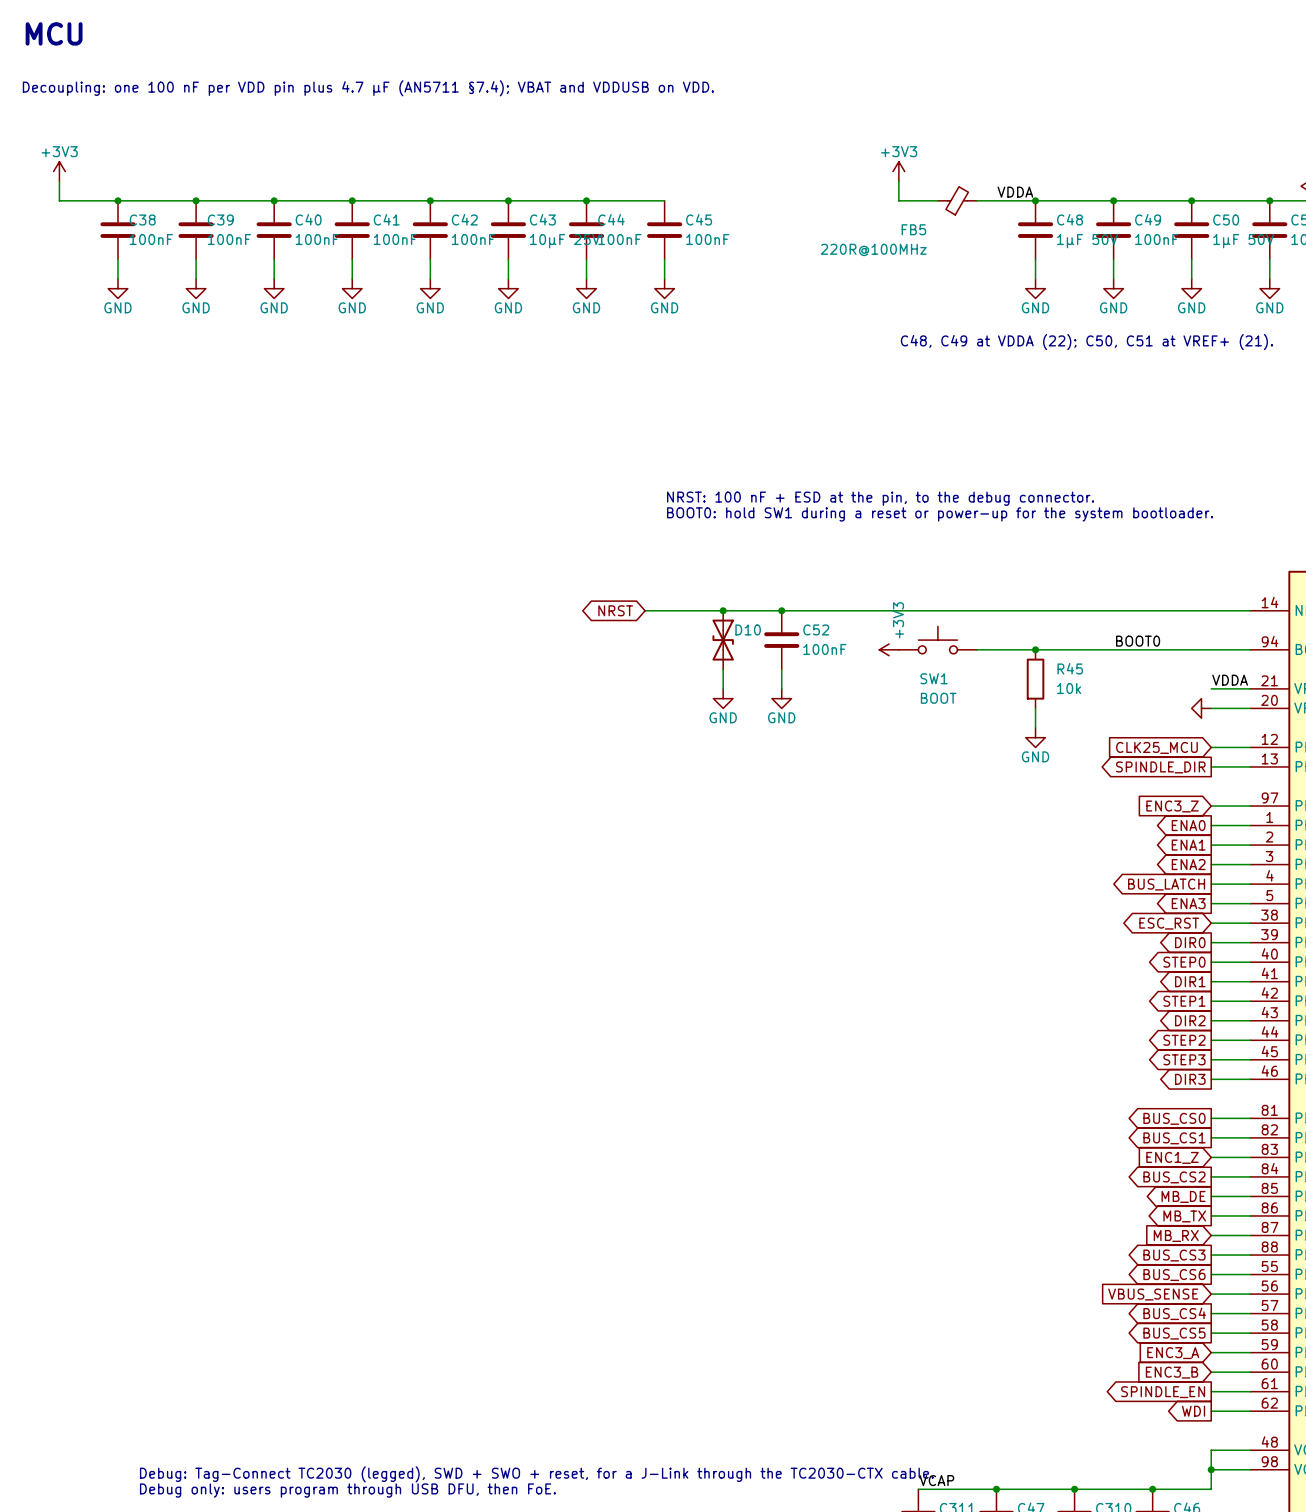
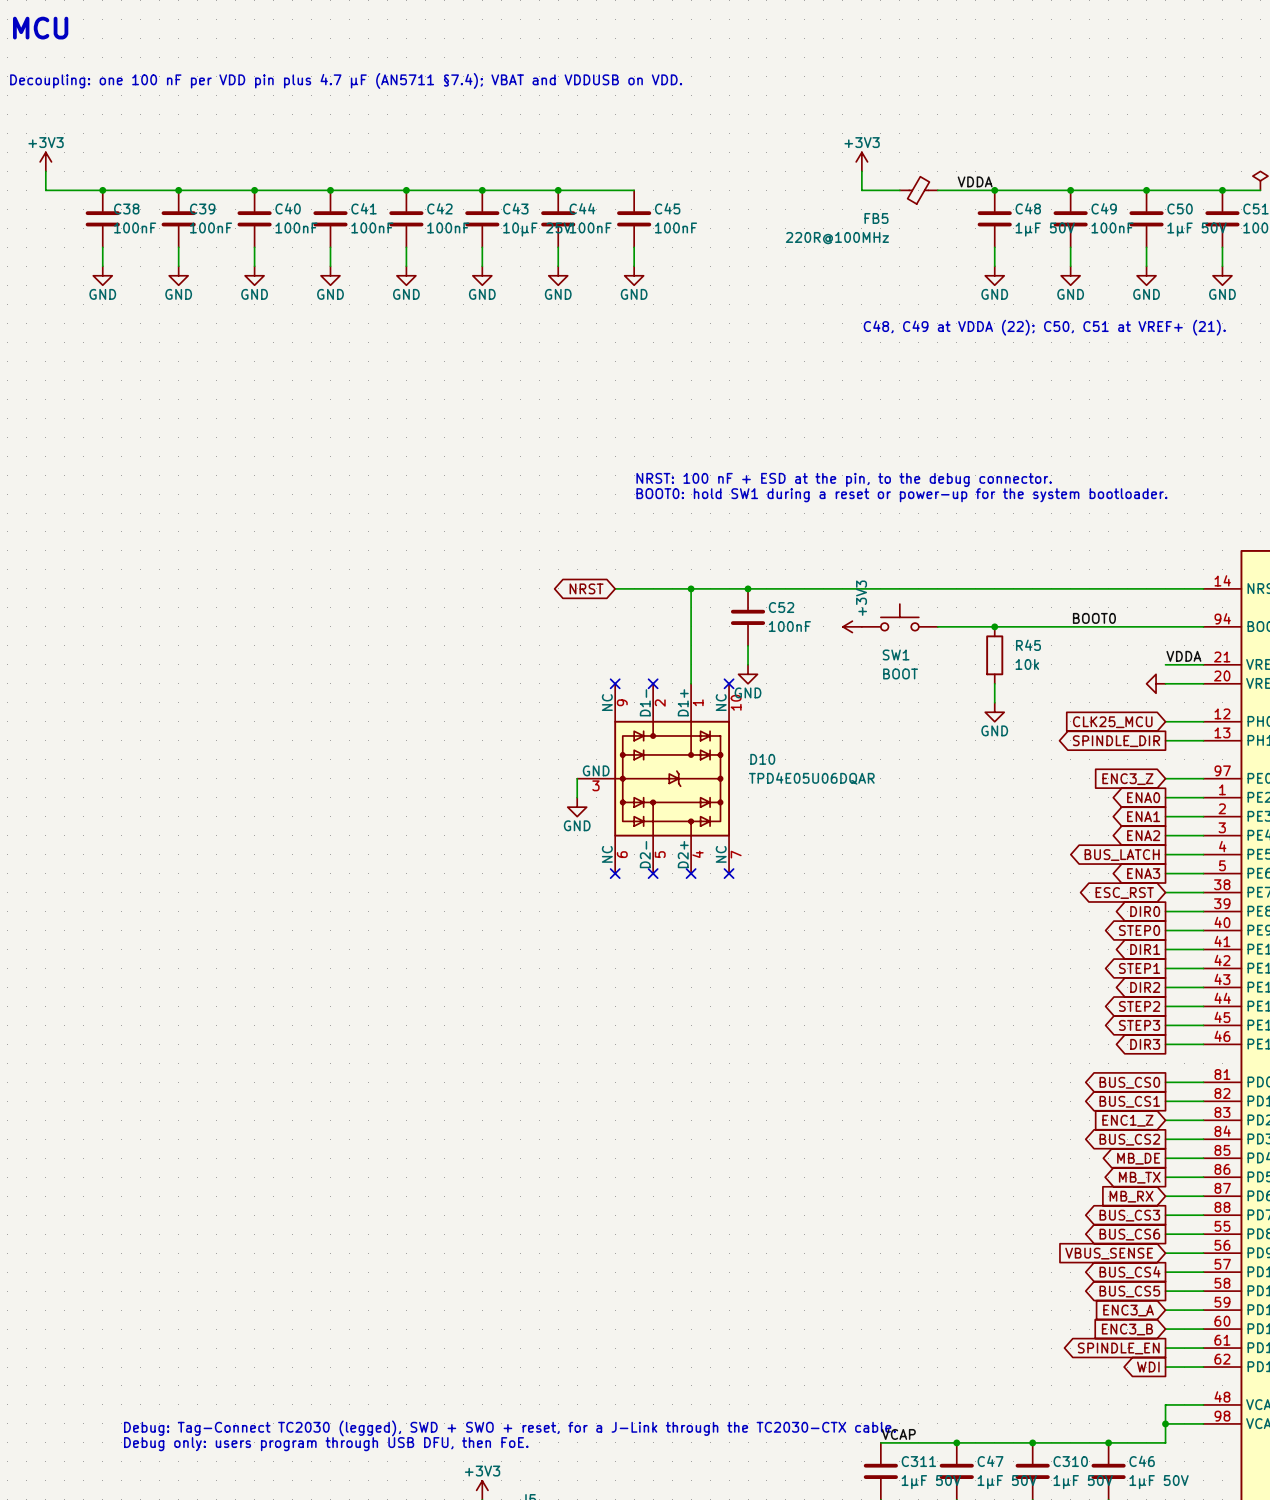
D10 symbol: [712, 610, 734, 670] -> [577, 683, 730, 874]
D10 name position: D10 (748, 629) -> D10 (762, 759)
power symbol position: GND (723, 698) -> GND (577, 807)
no-connect mark: none -> (615, 683)
no-connect mark: none -> (653, 683)
no-connect mark: none -> (729, 683)
D10 value: none -> TPD4E05U06DQAR (811, 778)
wire: none -> (577, 778) (577, 797)
no-connect mark: none -> (615, 873)
no-connect mark: none -> (653, 873)
no-connect mark: none -> (691, 873)
no-connect mark: none -> (729, 873)

